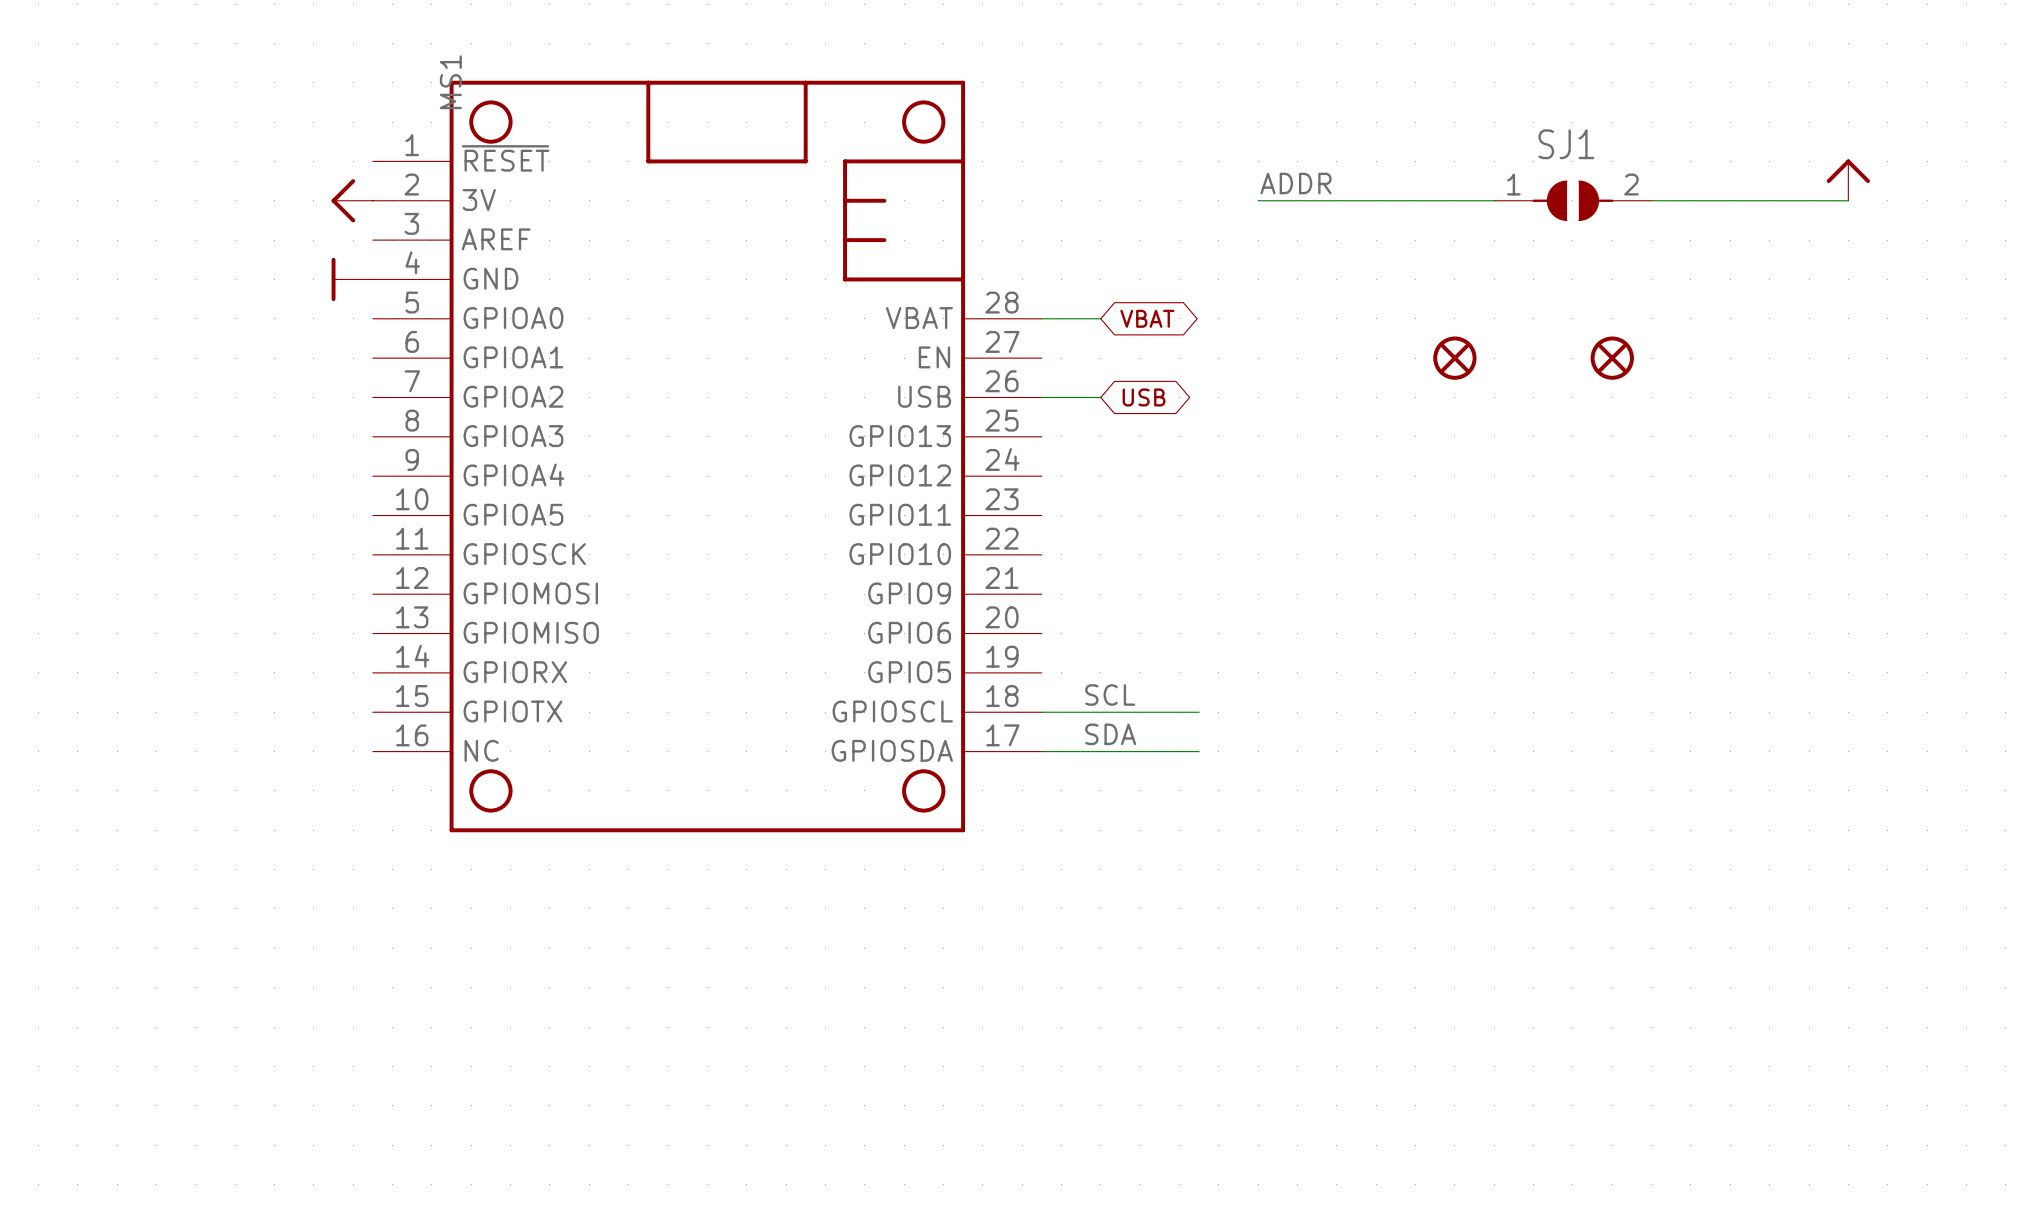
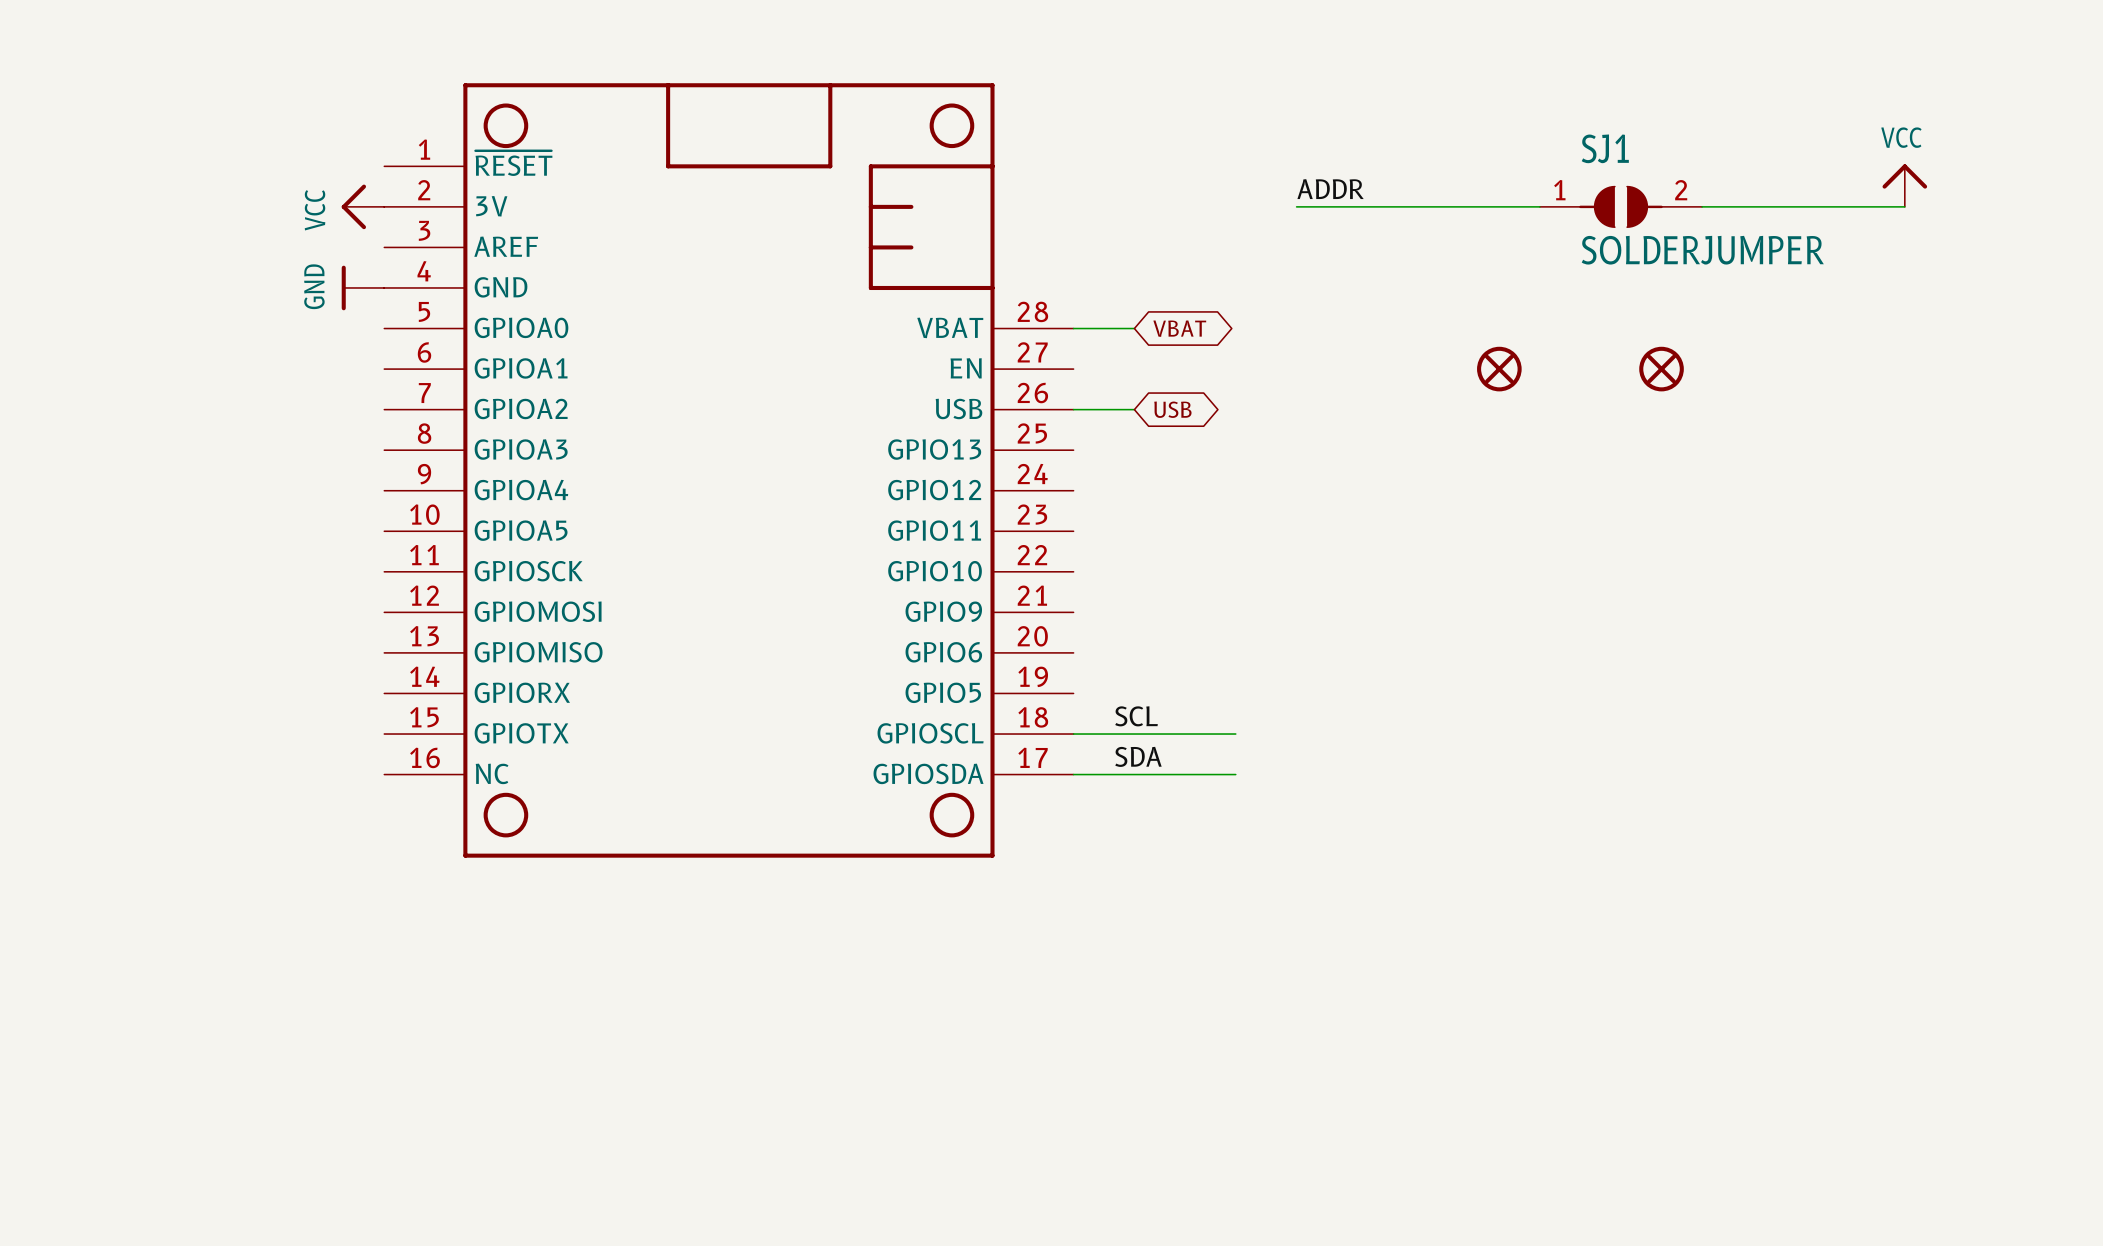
MS1 name: MS1 (450, 82) -> none
power symbol text: none -> VCC (1901, 137)
power symbol text: none -> VCC (315, 210)
SJ1 value: none -> SOLDERJUMPER (1702, 250)
power symbol text: none -> GND (314, 286)

